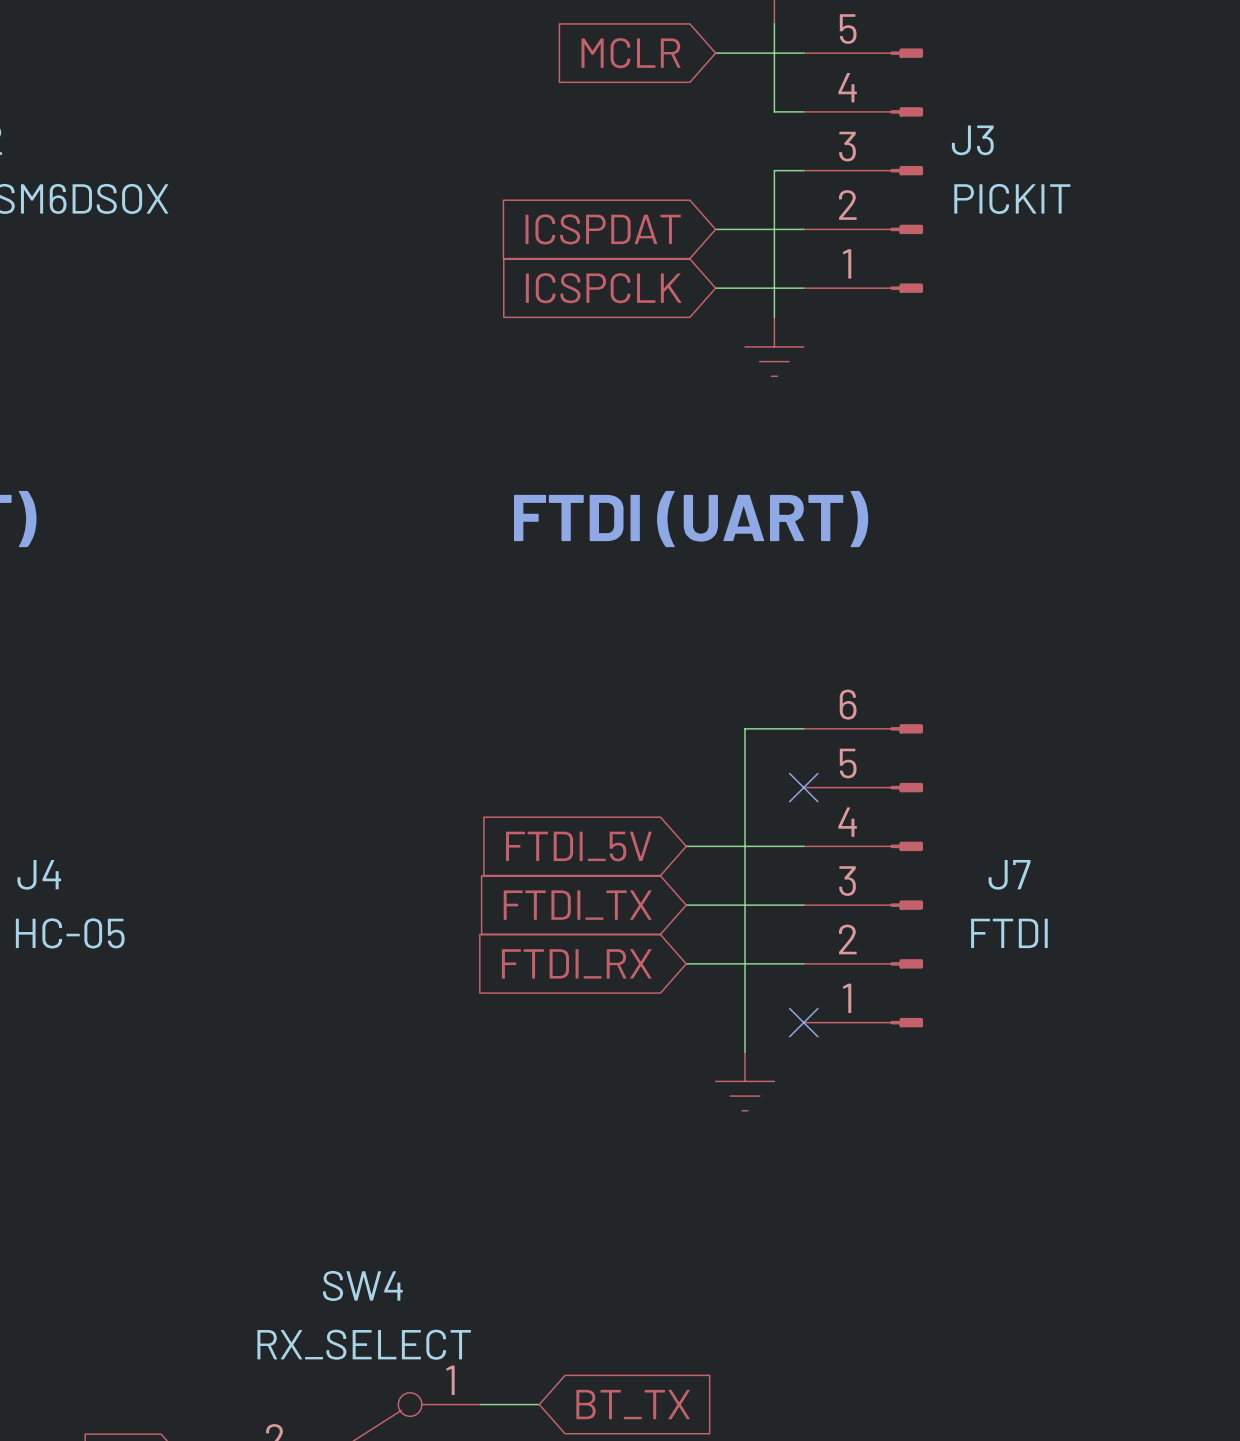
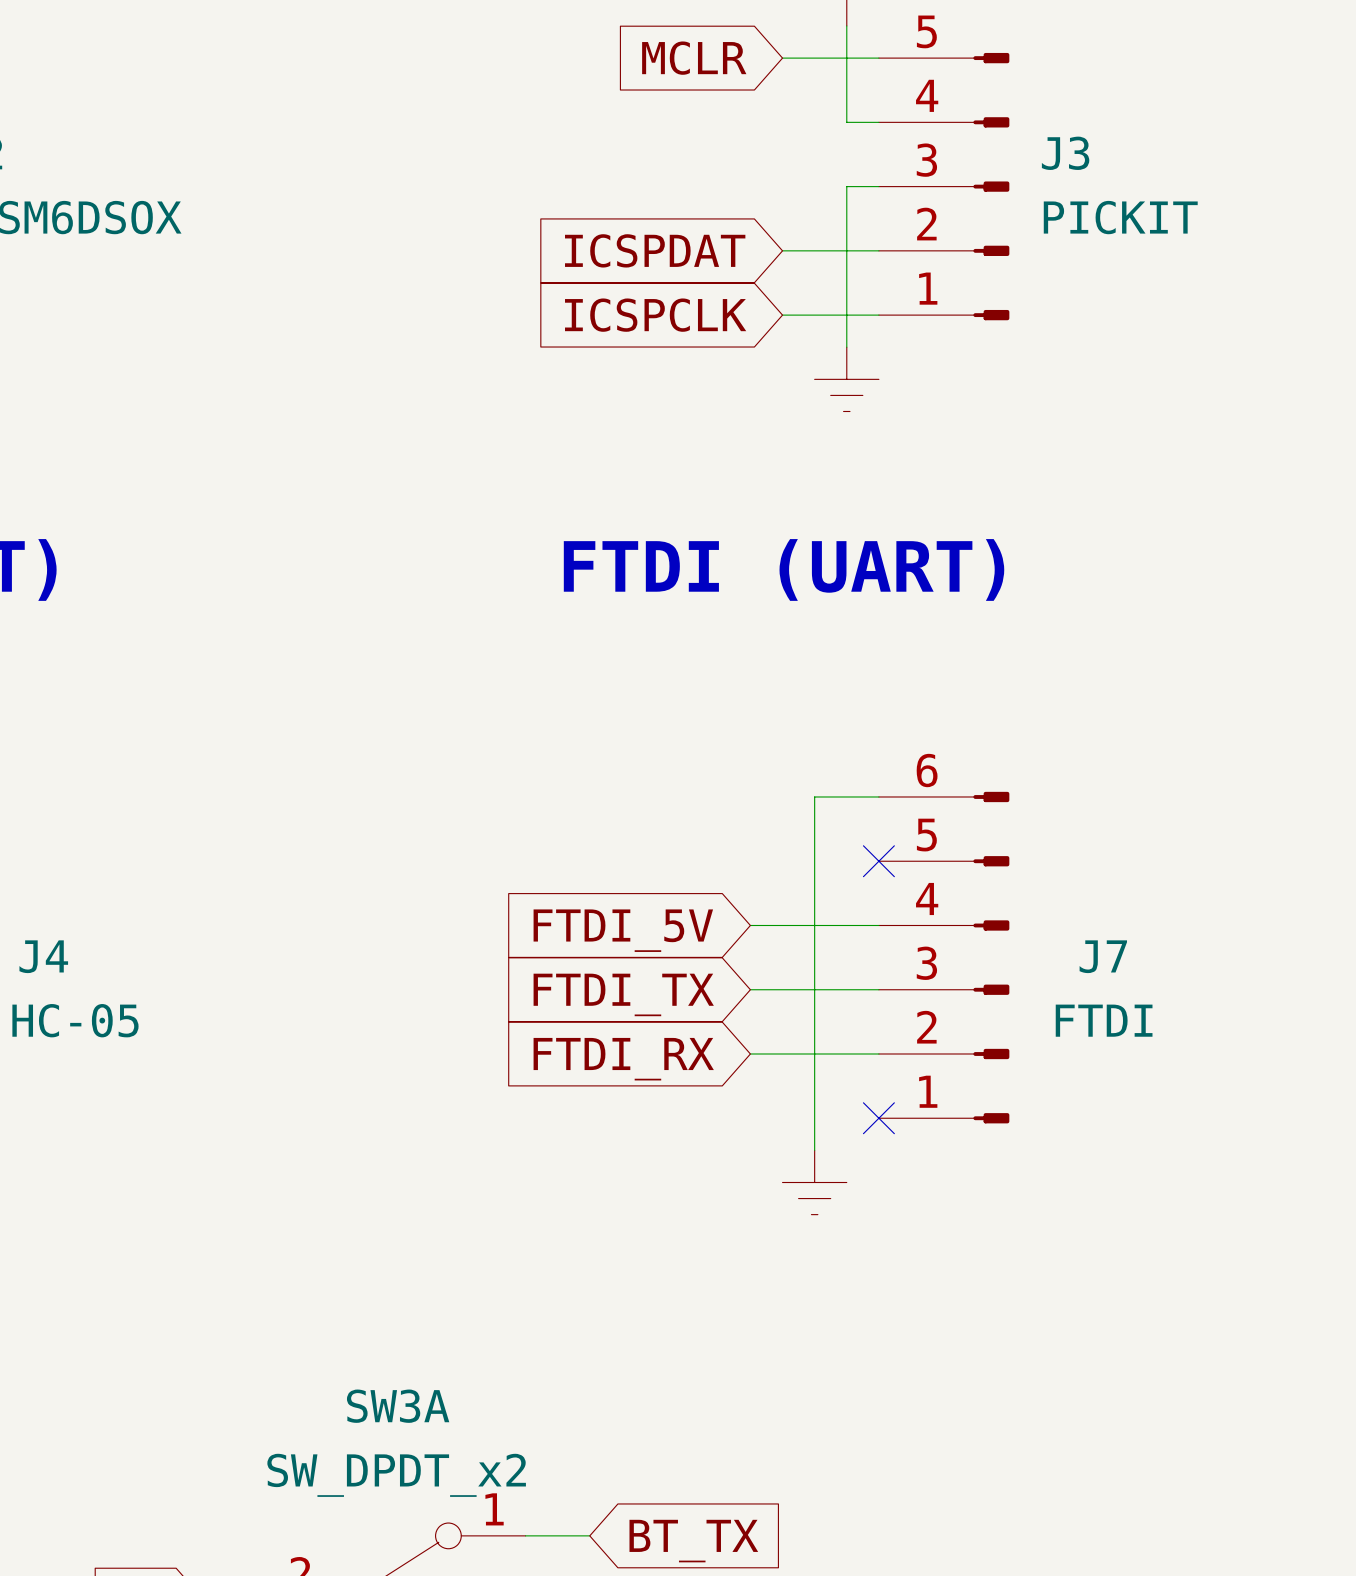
SW4 name: SW4 (362, 1285) -> SW3A (398, 1406)
SW4 value: RX_SELECT (364, 1344) -> SW_DPDT_x2 (396, 1475)

